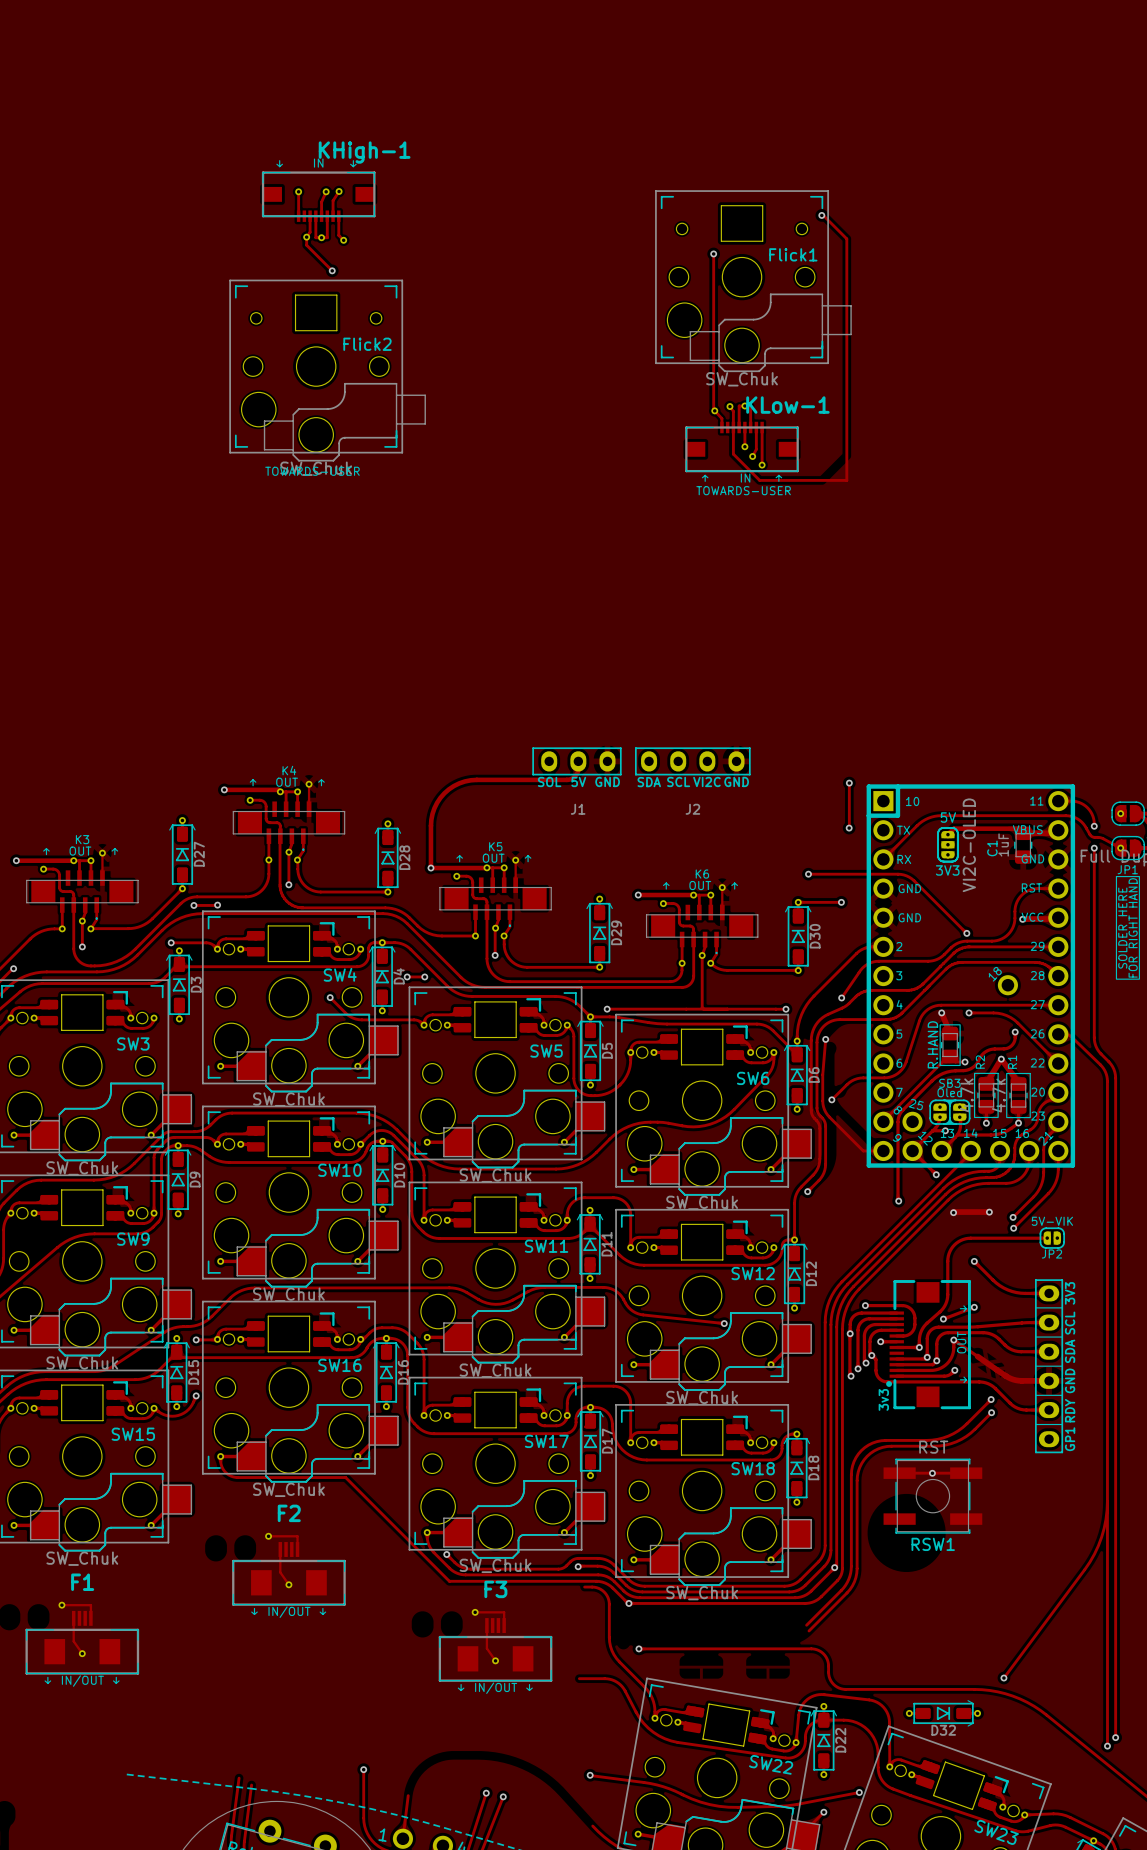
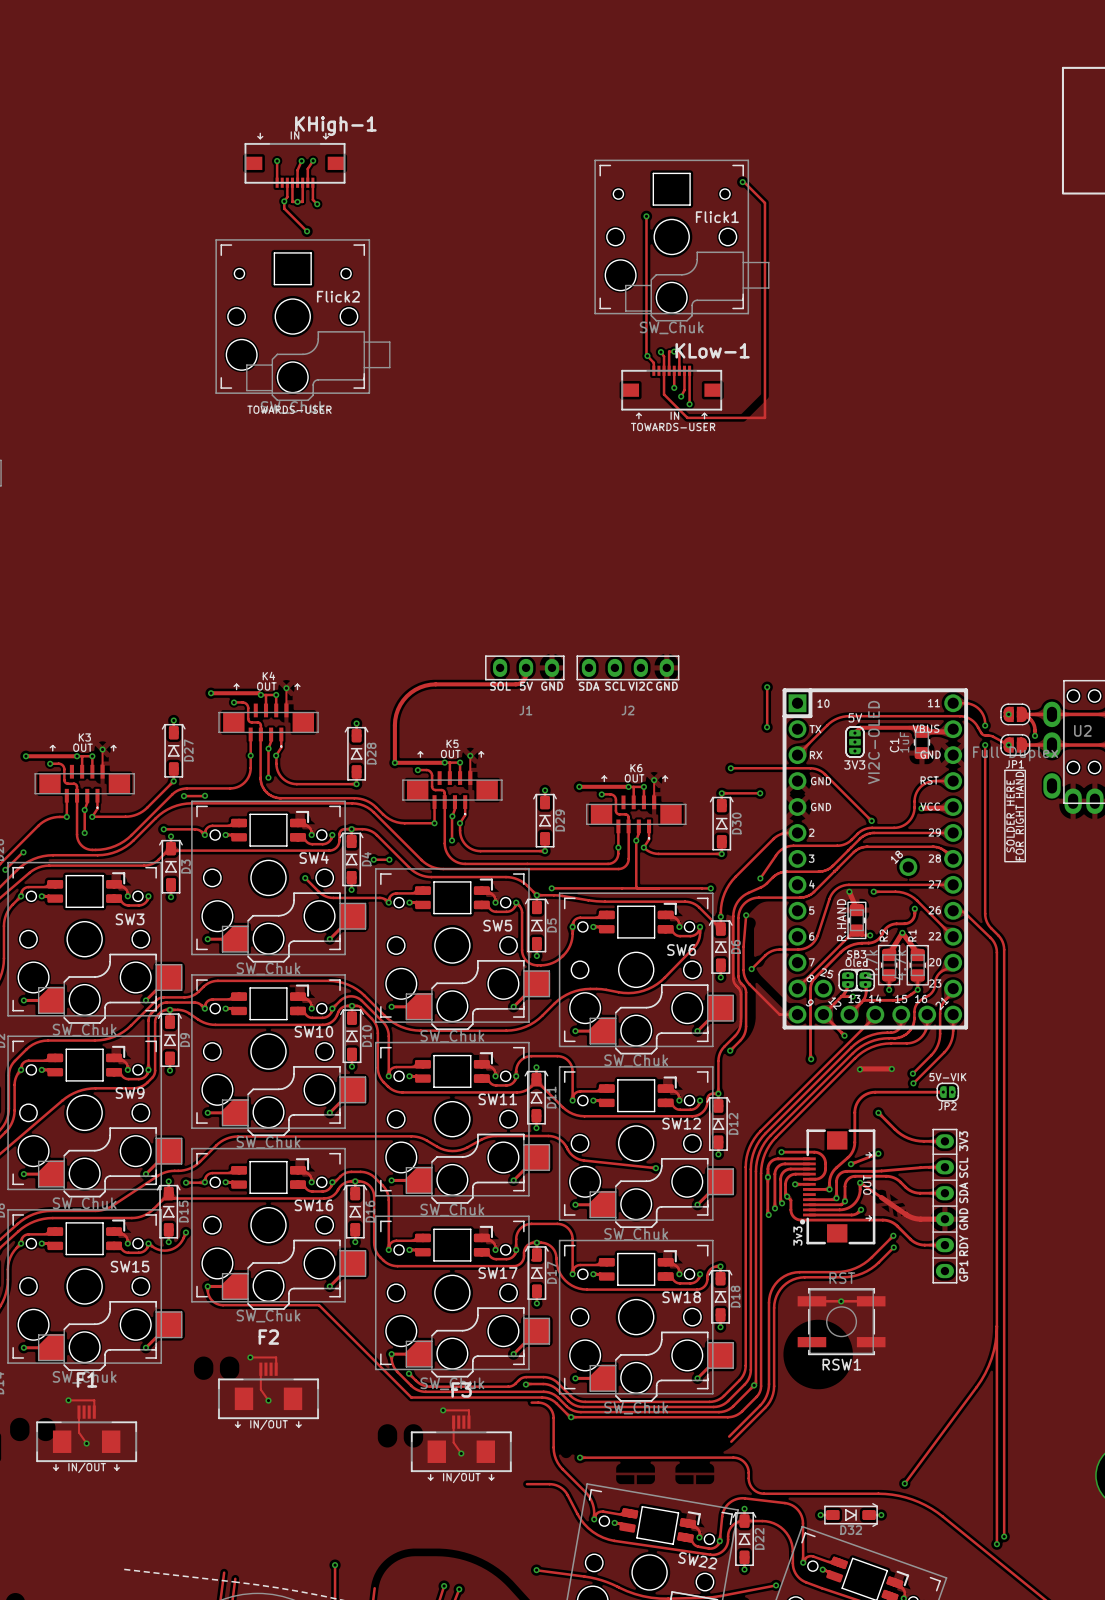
F1 position: (82, 1642) -> (86, 1433)
F3 position: (495, 1649) -> (461, 1443)

